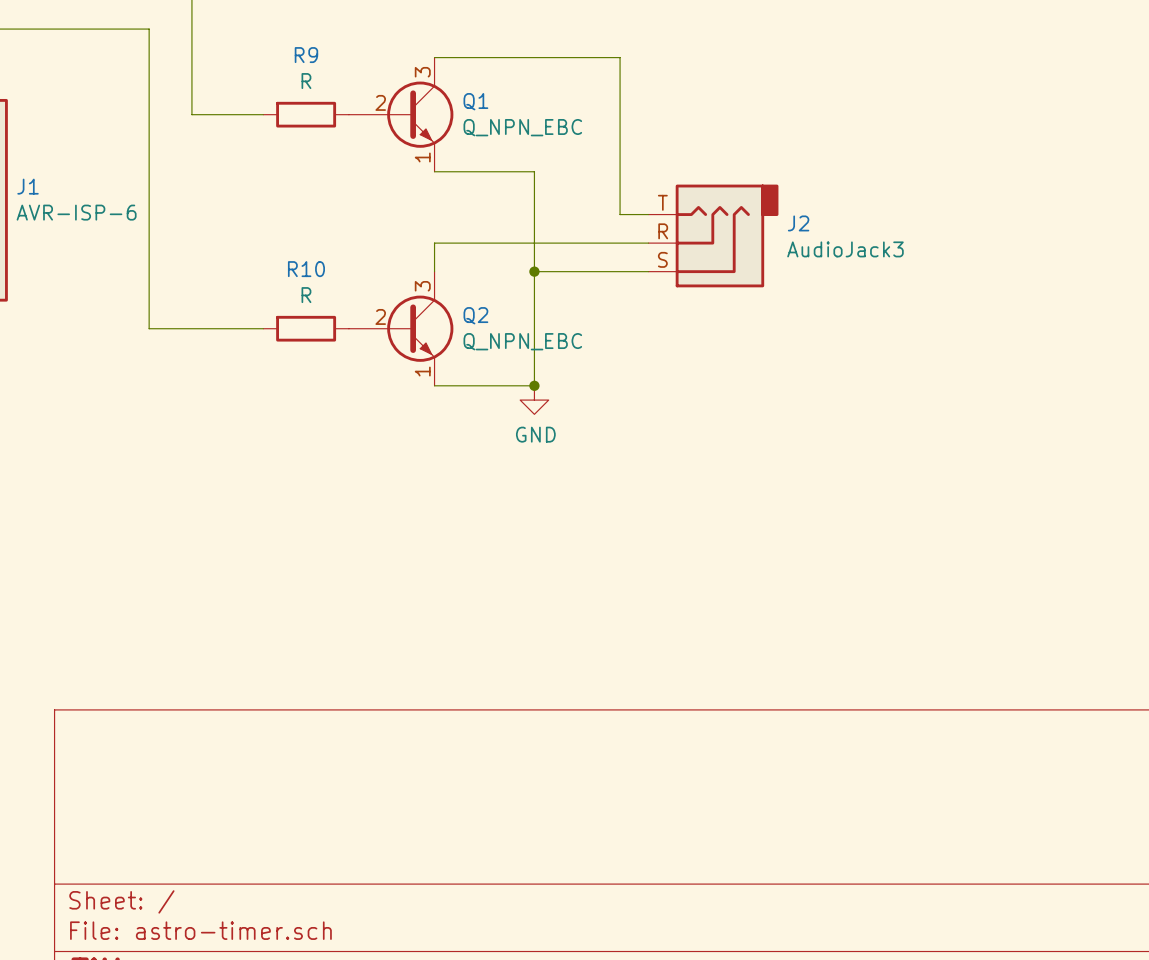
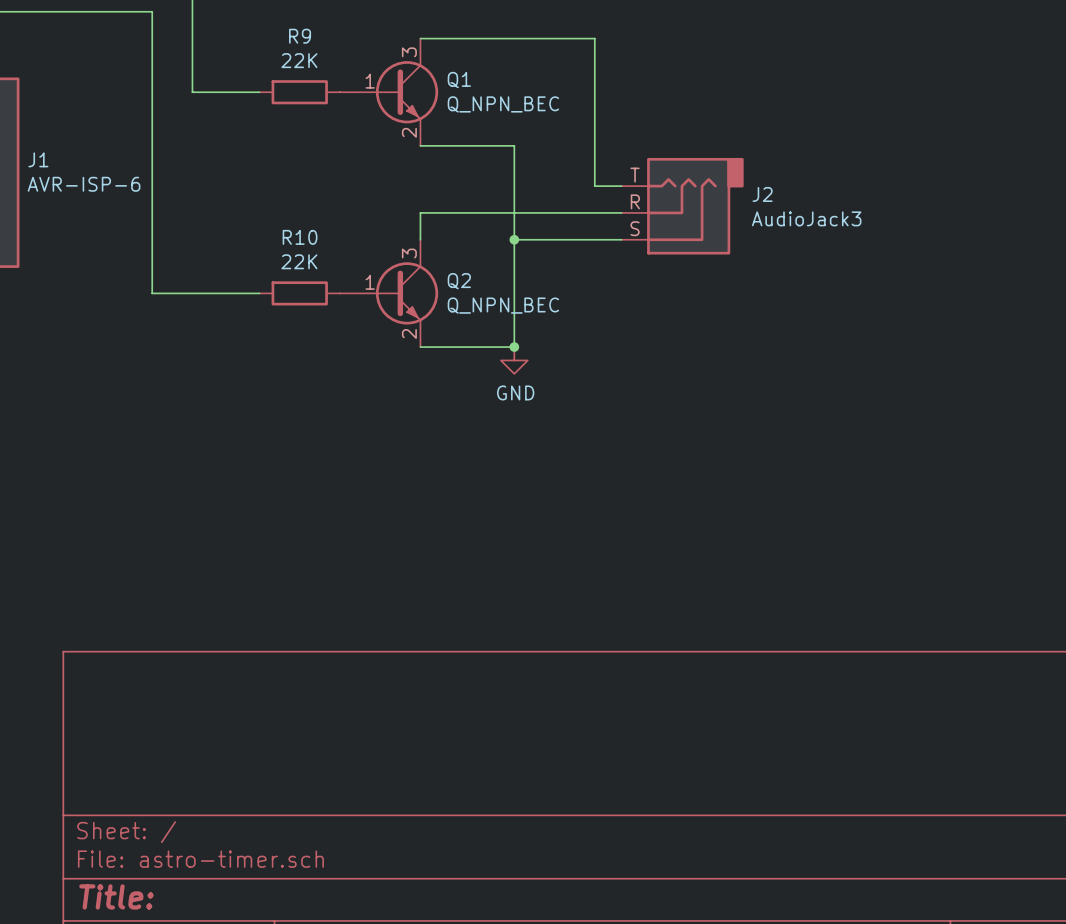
R9 value: R (306, 81) -> 22K (299, 60)
Q1 pin number: 2 (380, 102) -> 1 (370, 81)
Q1 value: Q_NPN_EBC (522, 127) -> Q_NPN_BEC (503, 104)
Q1 pin number: 1 (422, 157) -> 2 (409, 132)
R10 value: R (306, 295) -> 22K (299, 261)
Q2 pin number: 2 (380, 316) -> 1 (370, 282)
Q2 value: Q_NPN_EBC (522, 341) -> Q_NPN_BEC (503, 305)
Q2 pin number: 1 (422, 371) -> 2 (409, 333)

